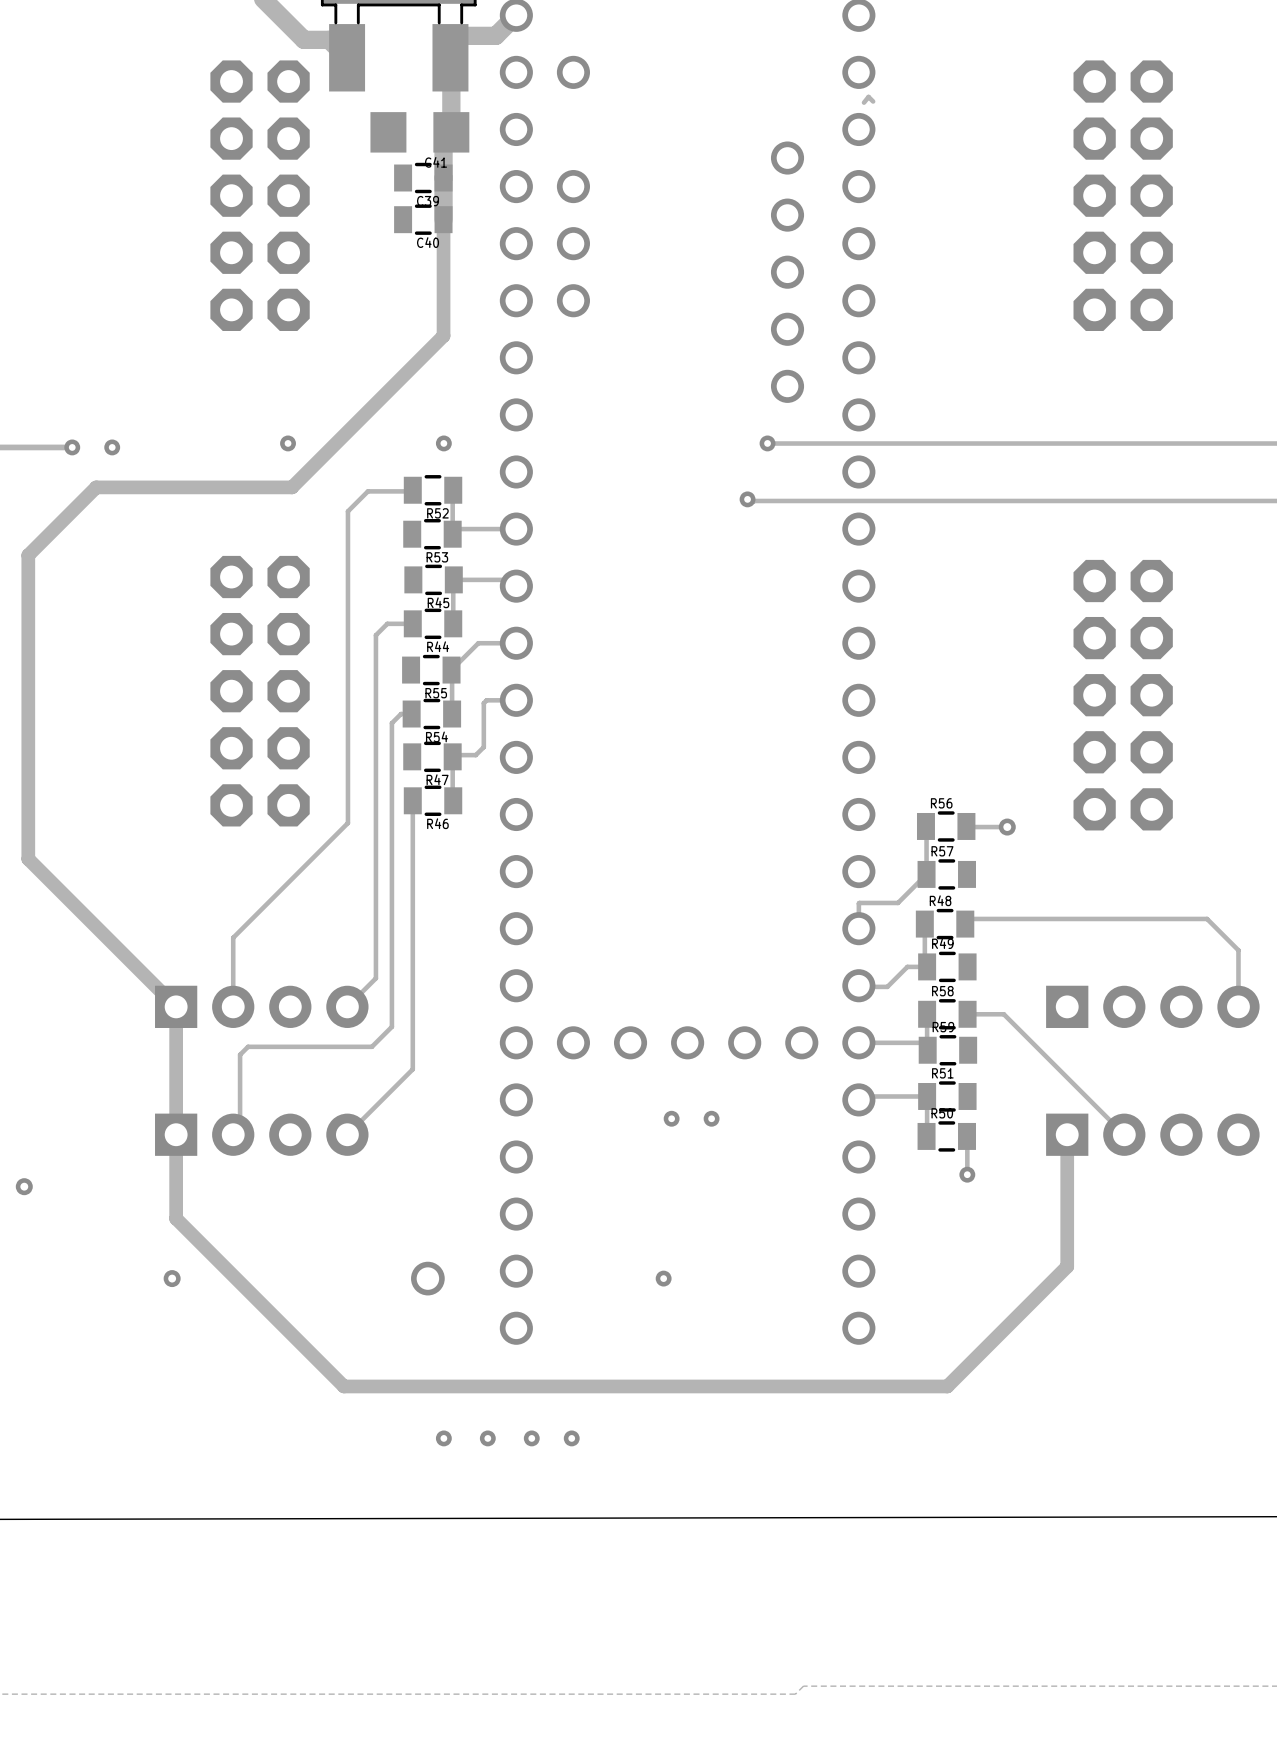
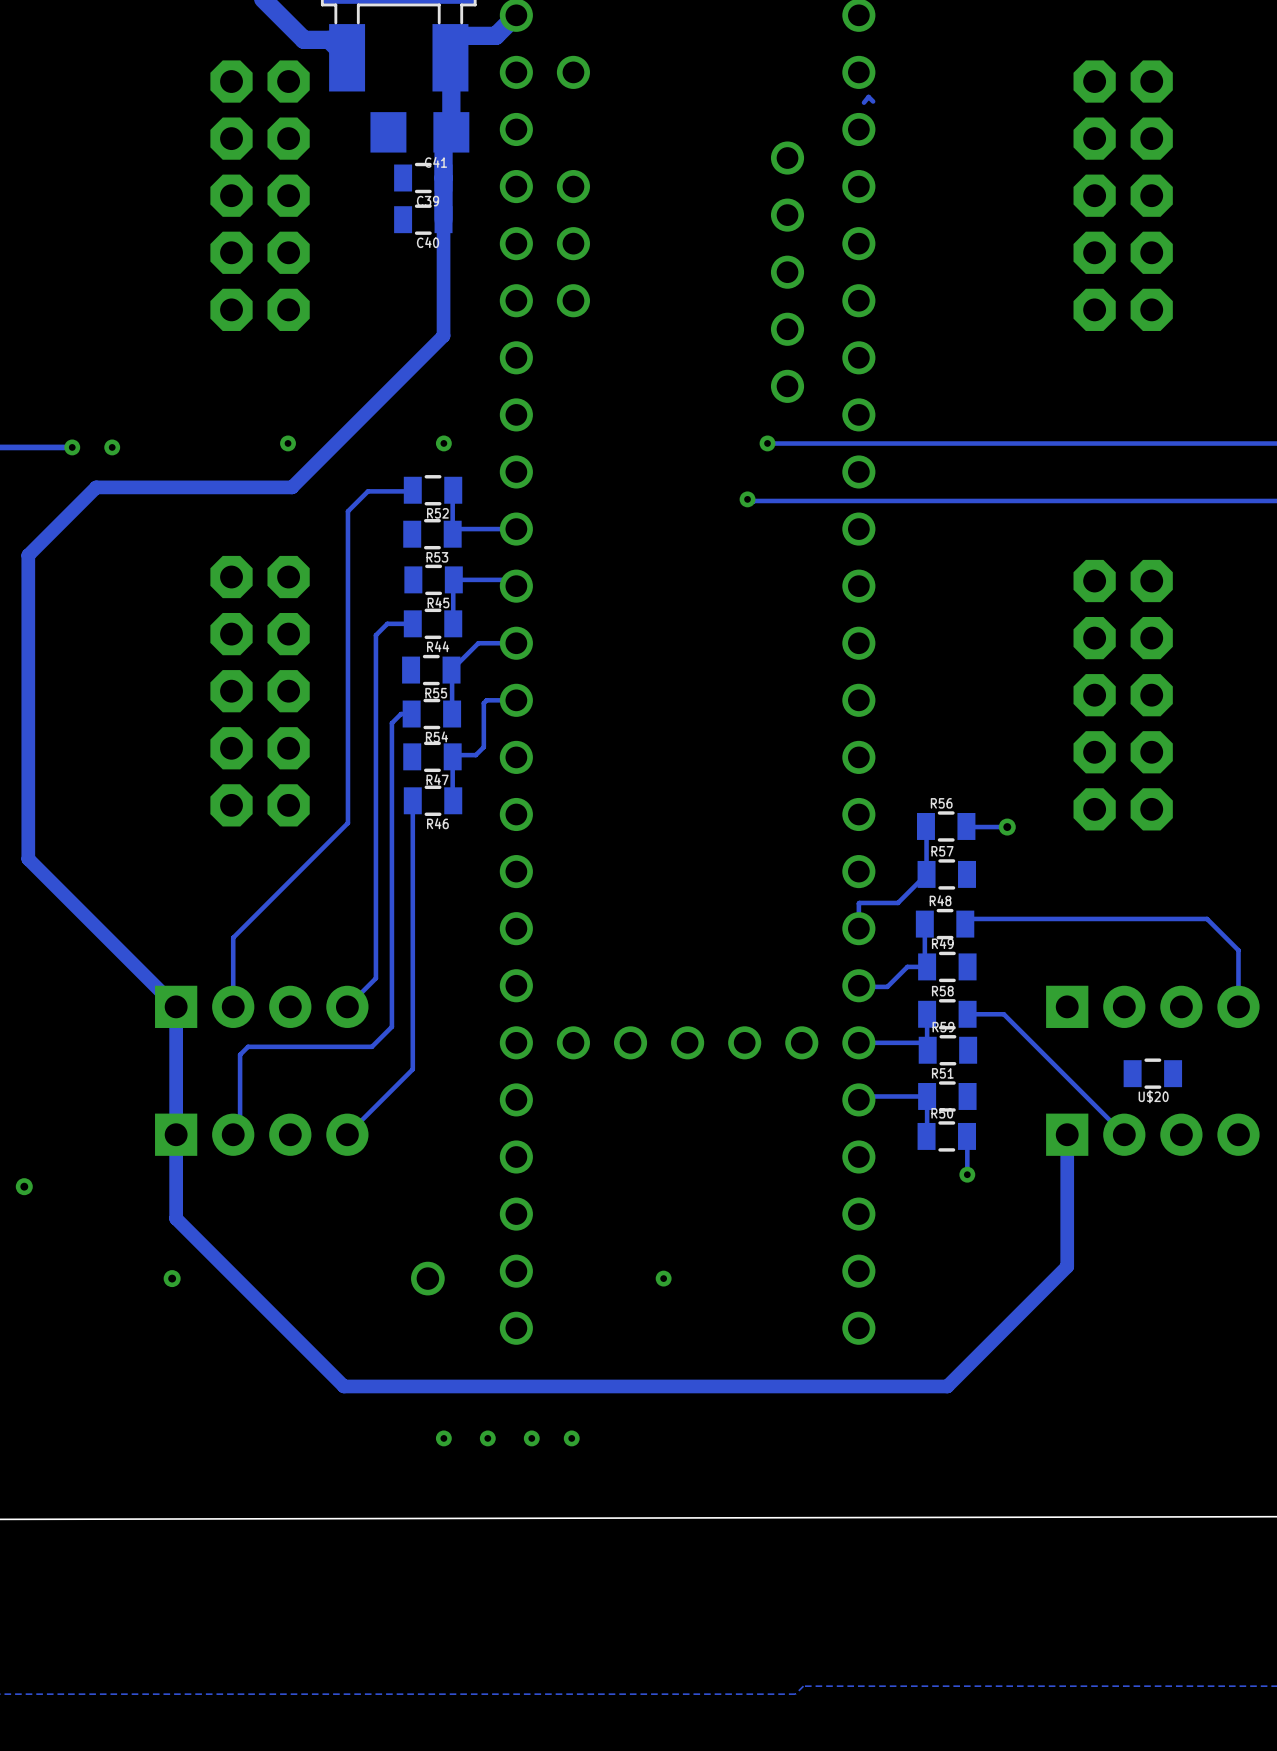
U$20: none -> (1152, 1073)
via: (671, 1118) -> none
via: (711, 1118) -> none

